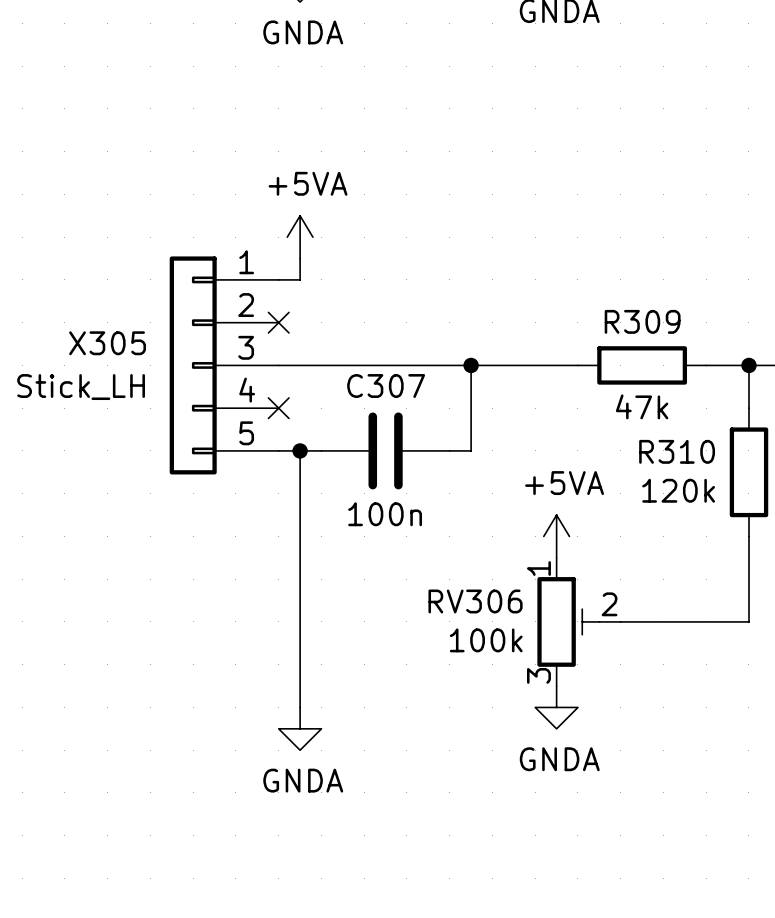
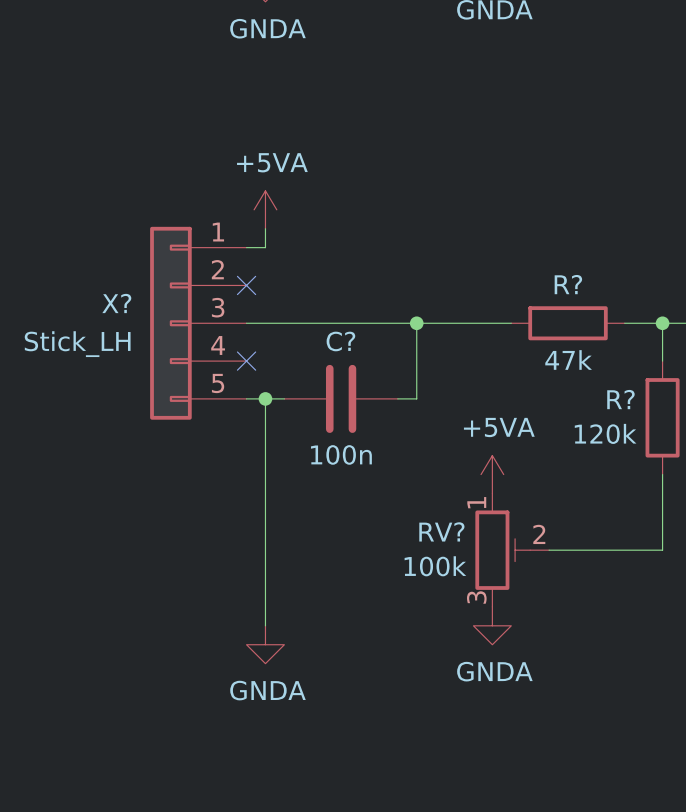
R309 name: R309 (642, 321) -> R? (568, 284)
X305 name: X305 (107, 343) -> X? (116, 303)
C307 name: C307 (386, 386) -> C? (340, 341)
R310 name: R310 (677, 451) -> R? (620, 399)
RV306 name: RV306 (475, 601) -> RV? (441, 531)

